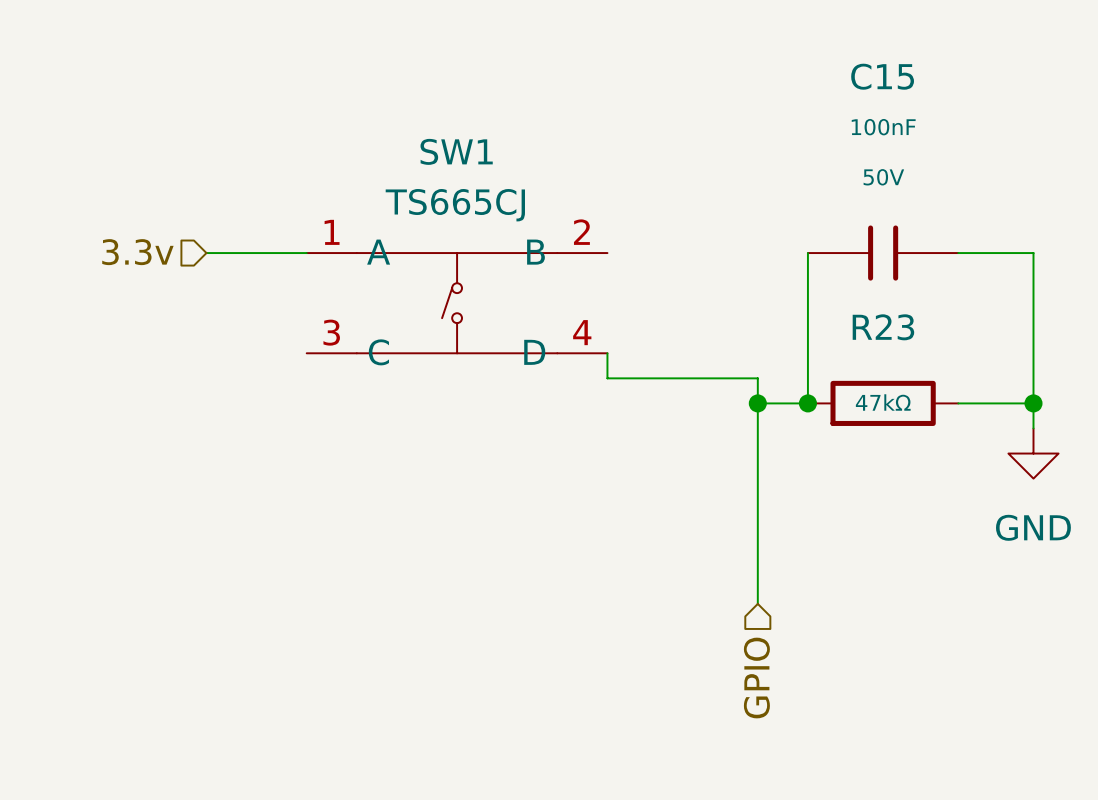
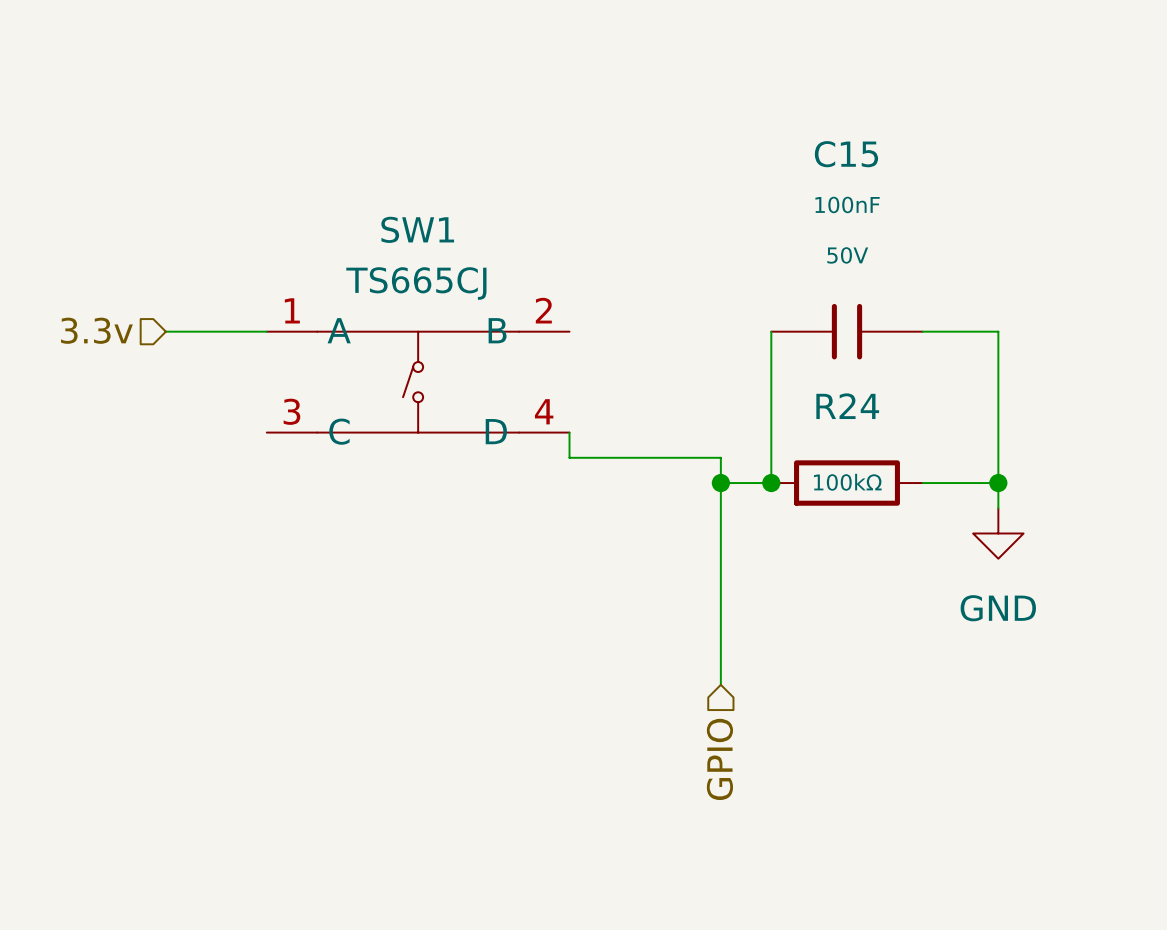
R23 name: R23 (883, 327) -> R24 (847, 406)
R23 value: 47kΩ (883, 402) -> 100kΩ (847, 482)

